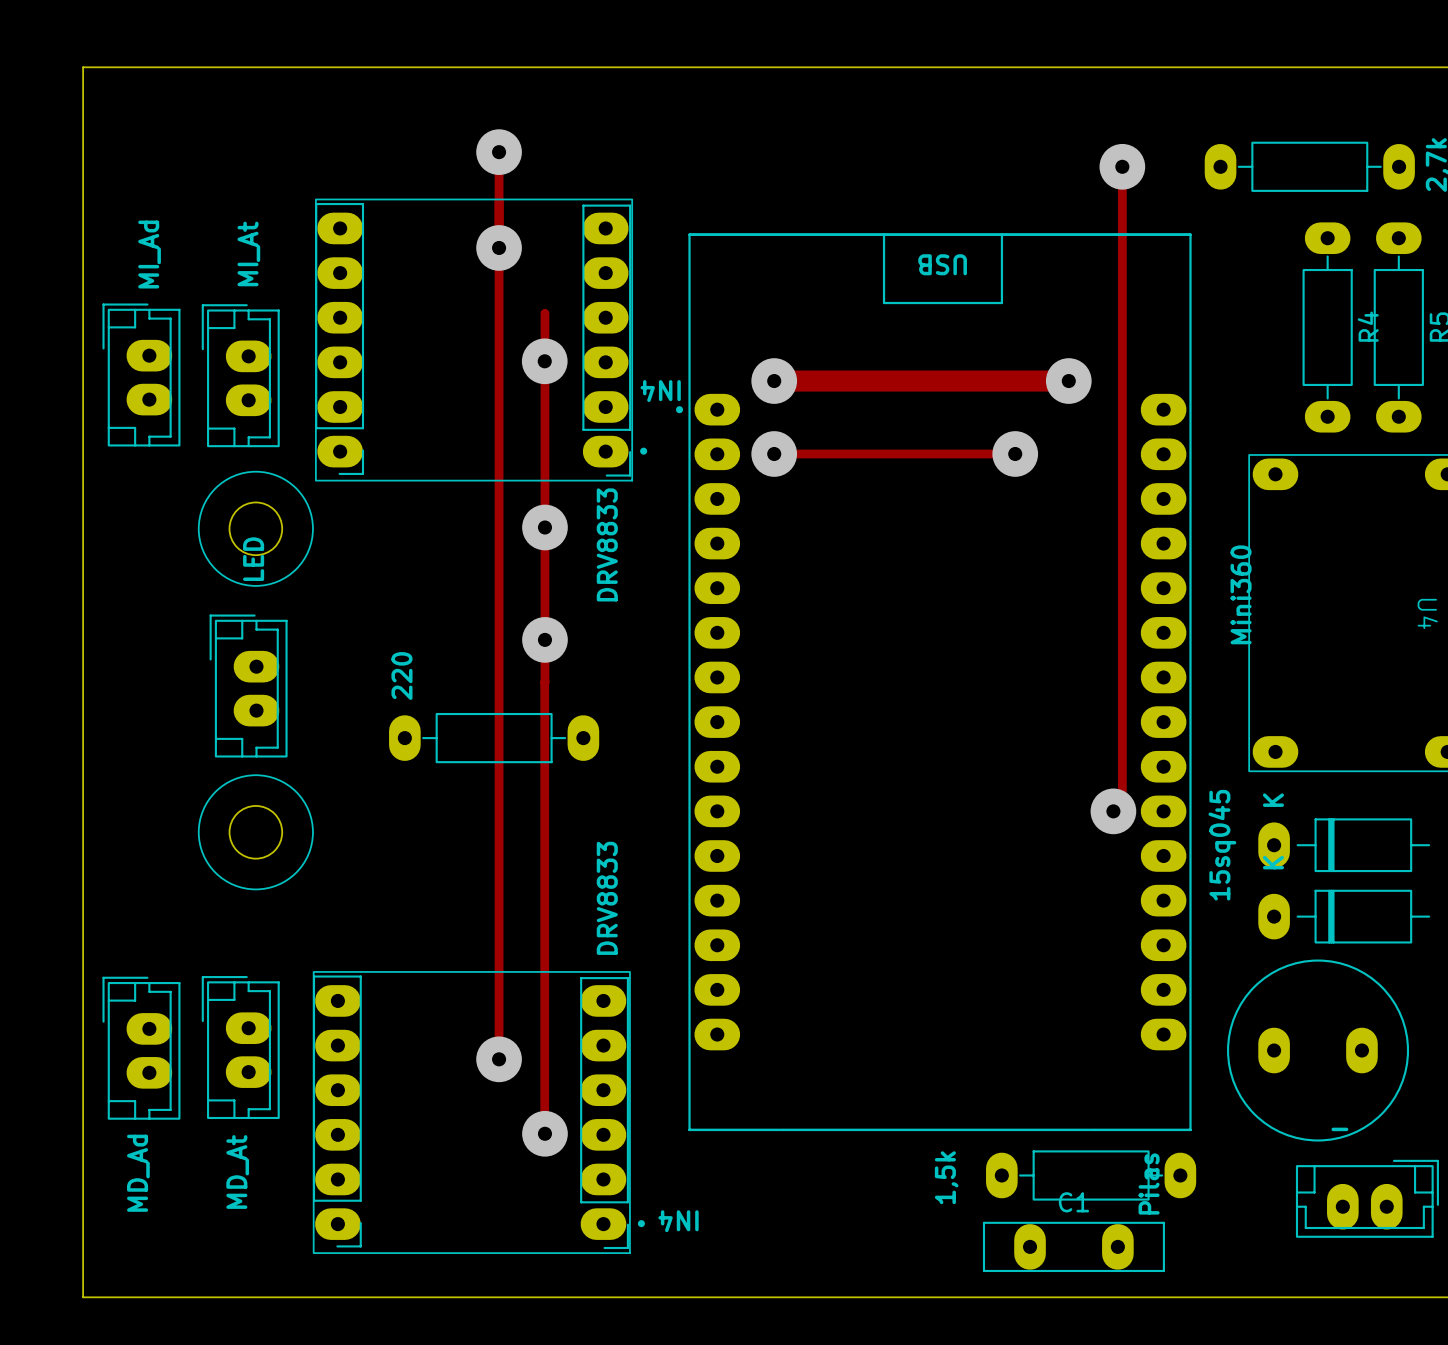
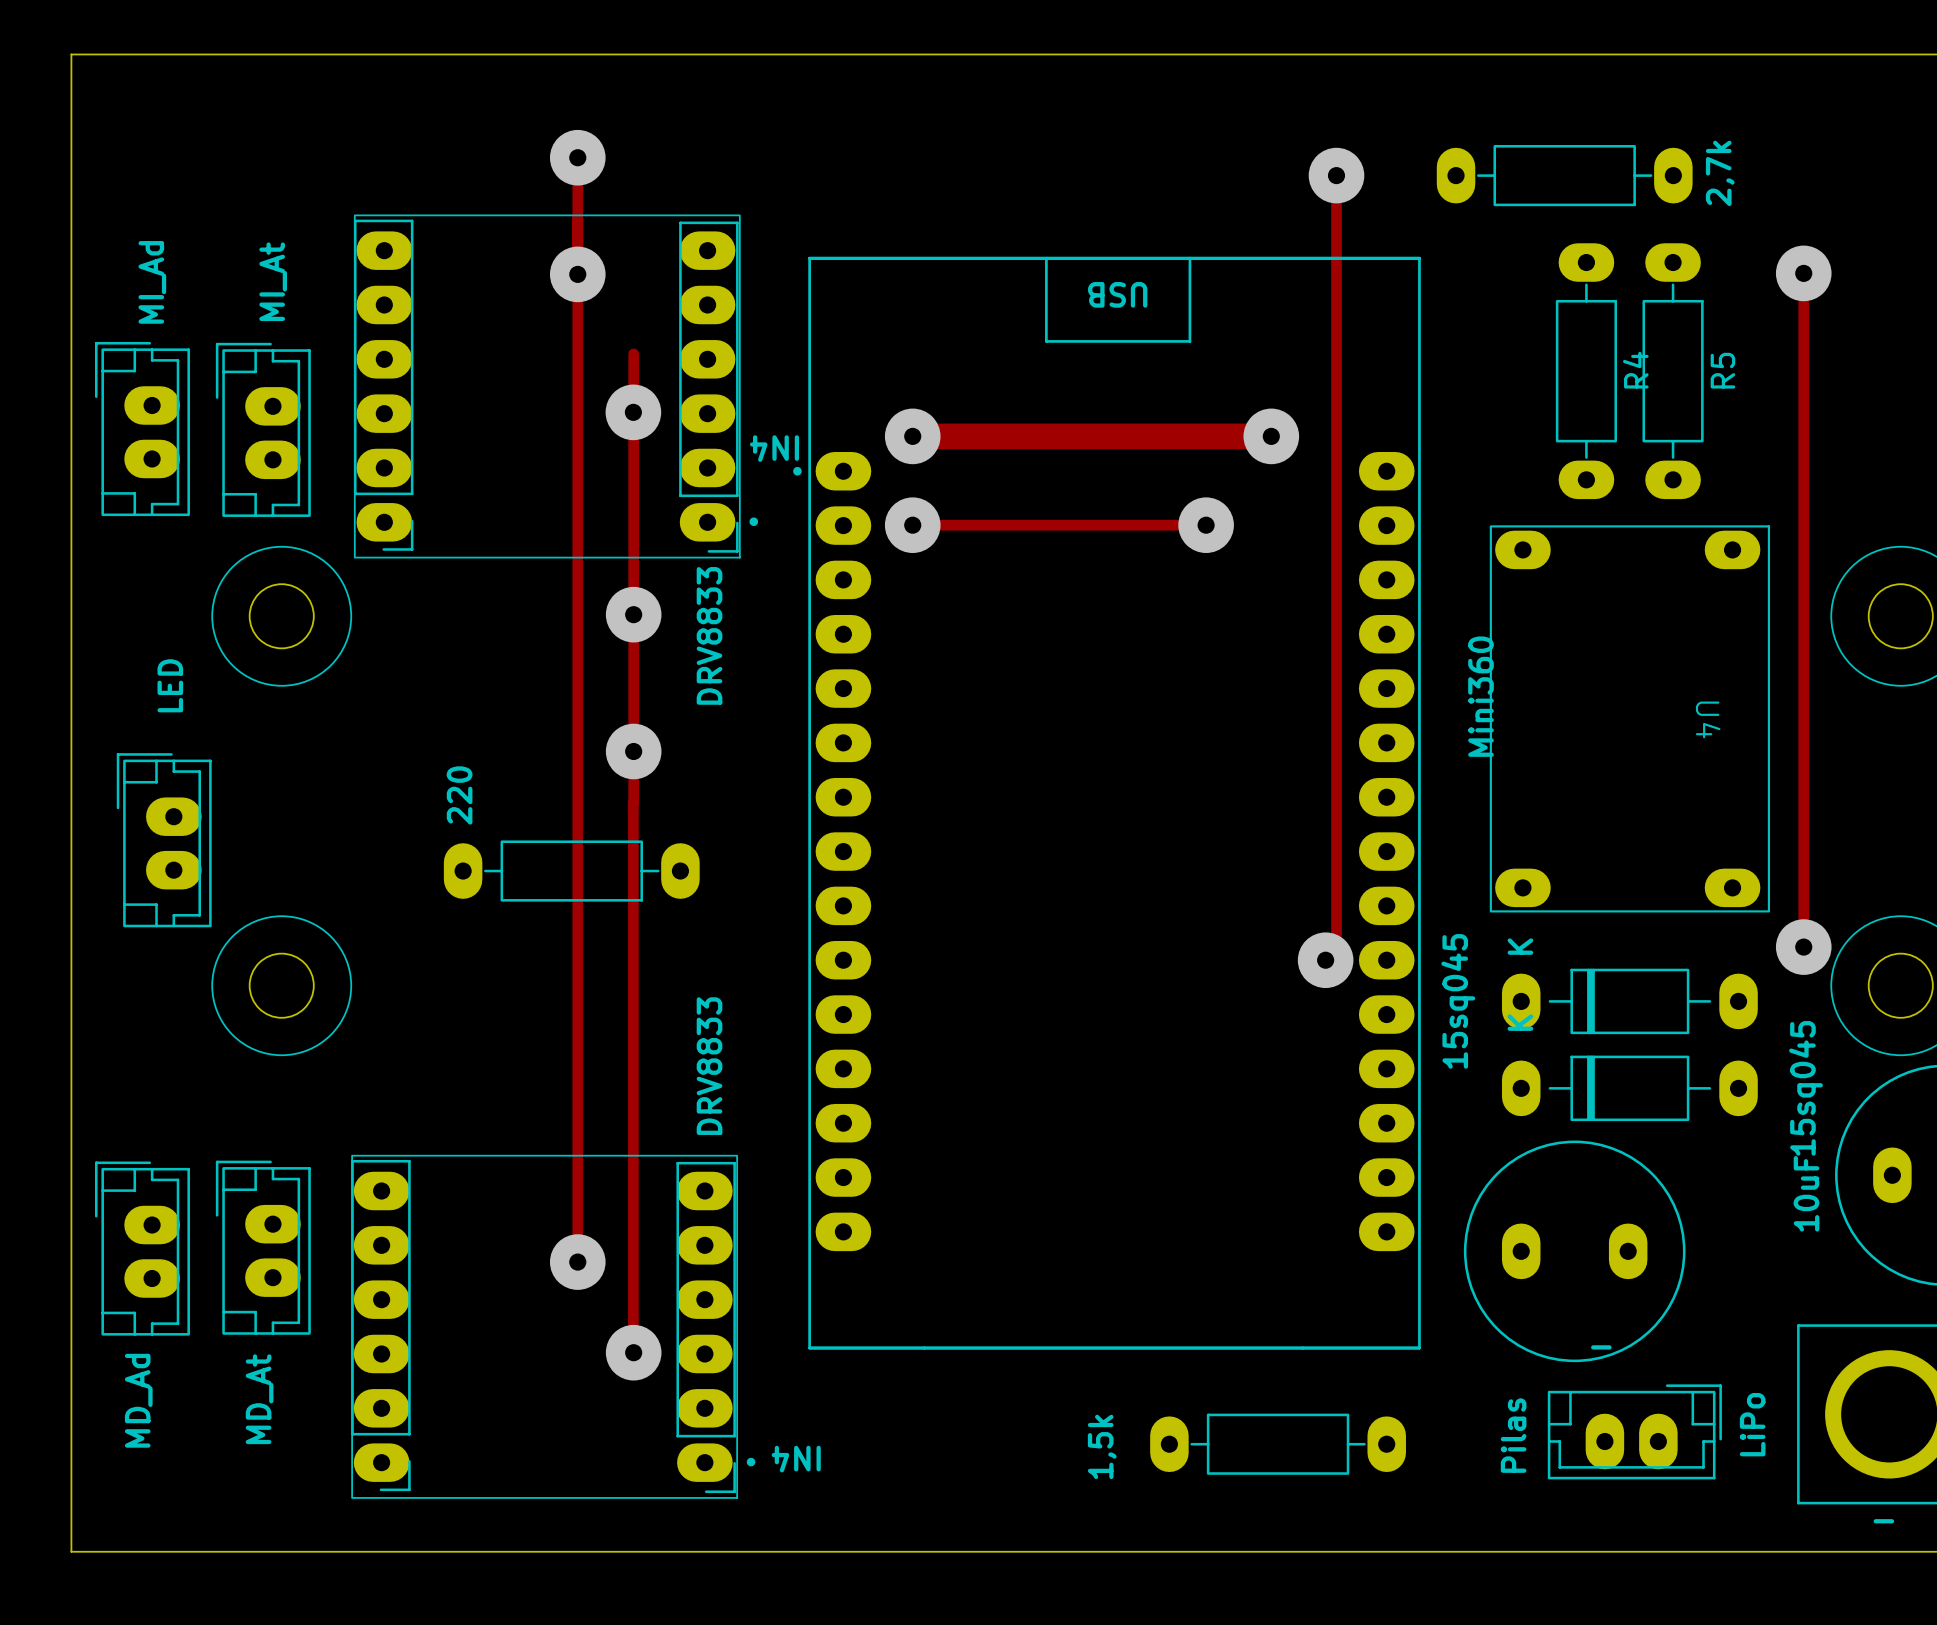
part position: (248, 686) -> (164, 840)
part position: (1091, 1175) -> (1278, 1444)
part value position: Pilas (1149, 1183) -> Pilas (1513, 1435)
C1: (1073, 1246) -> none

